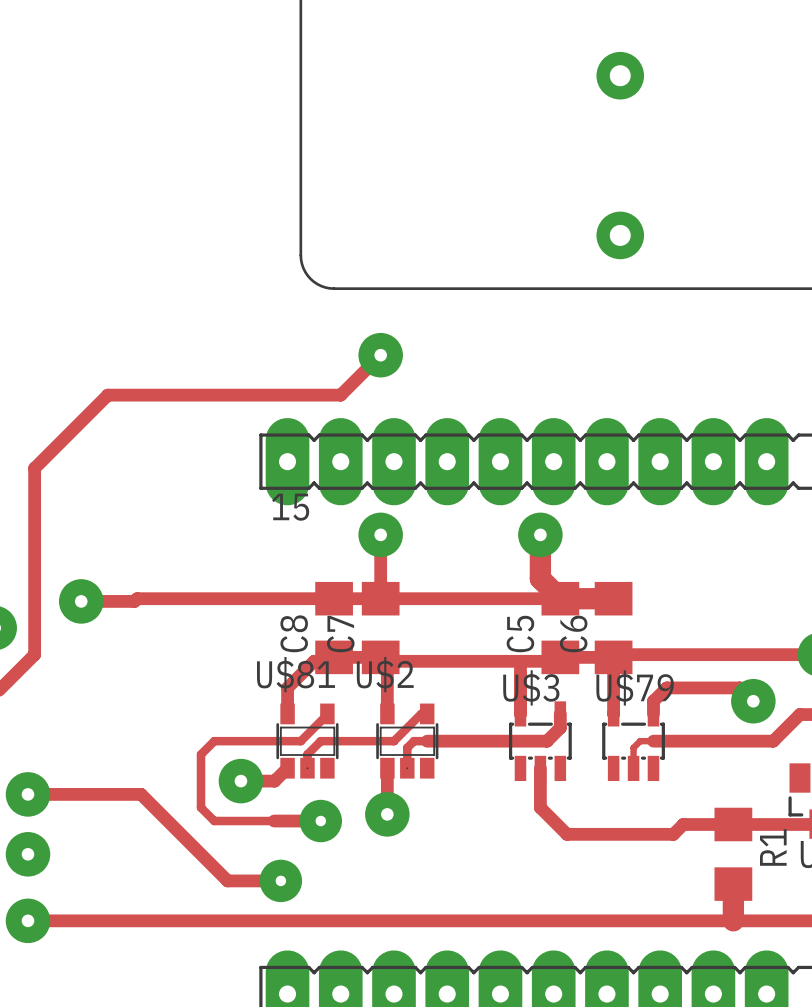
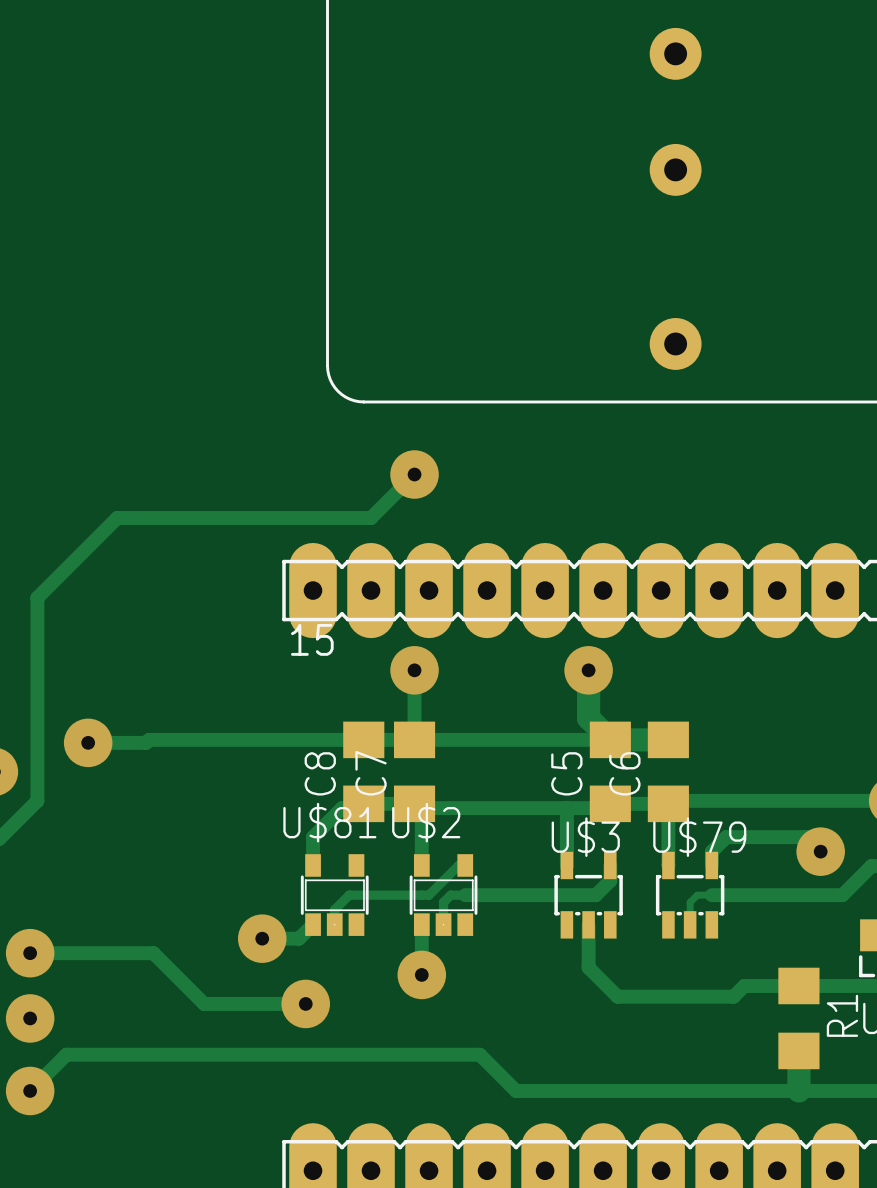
track: (327, 713) (300, 741) (214, 741) (201, 754) (201, 807) (214, 821) (320, 821) -> none
via: (320, 821) -> none
track: (187, 840) (227, 880) (280, 880) -> (204, 1003) (305, 1003)
via: none -> (305, 1003)
via: (280, 880) -> none
track: (27, 920) (473, 920) -> (30, 1090) (66, 1054) (479, 1054) (516, 1090)

